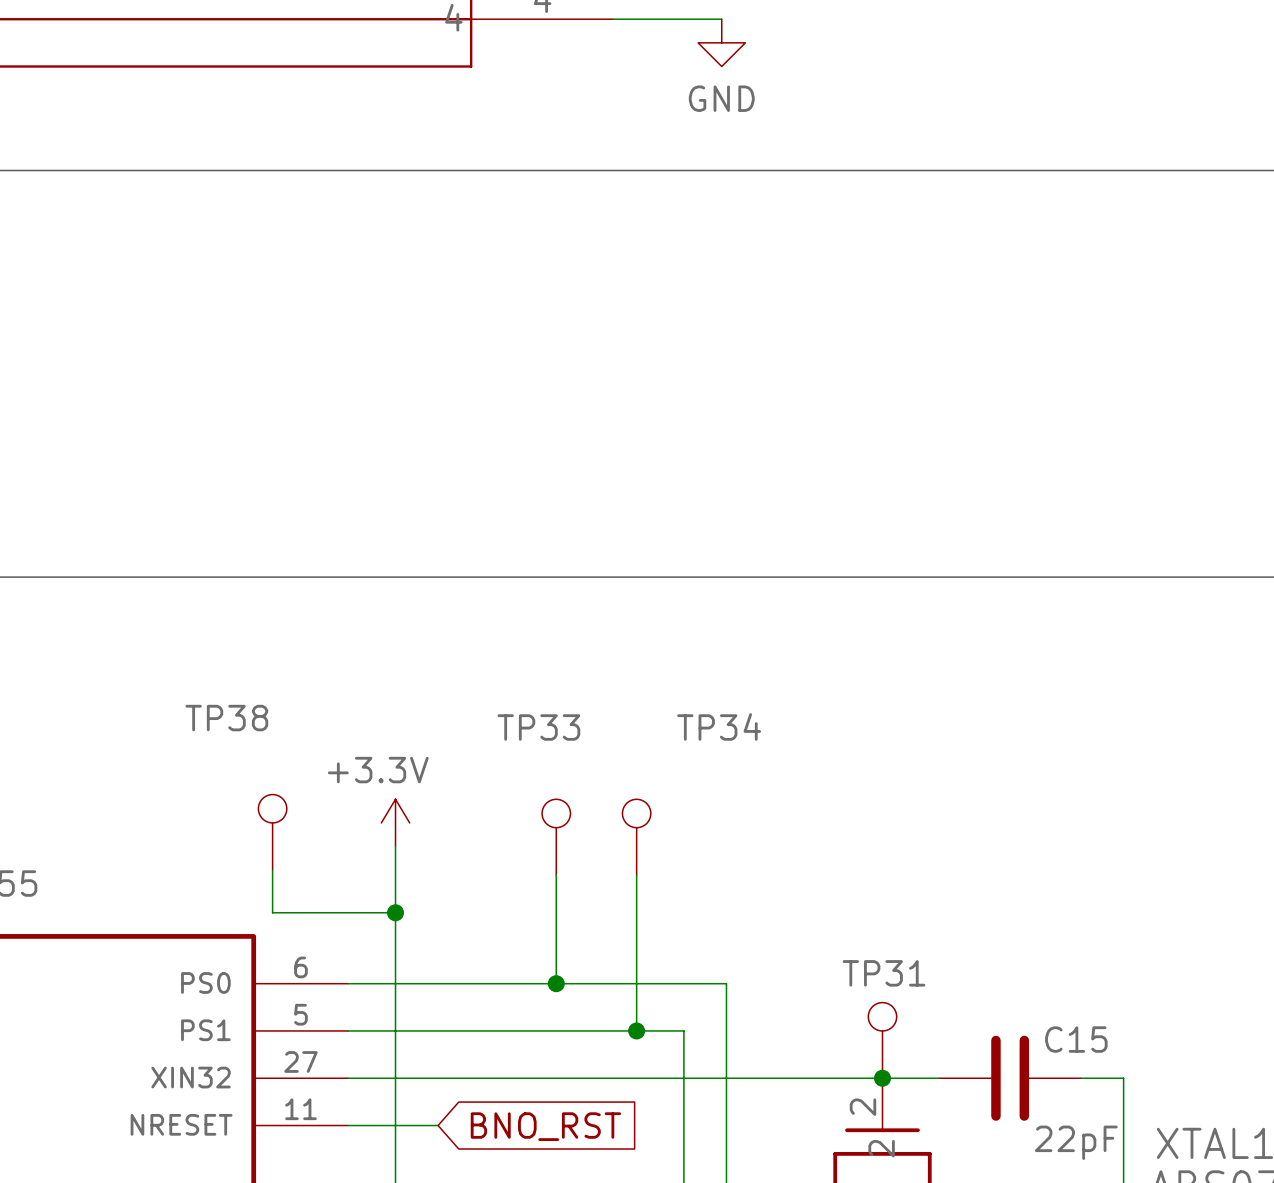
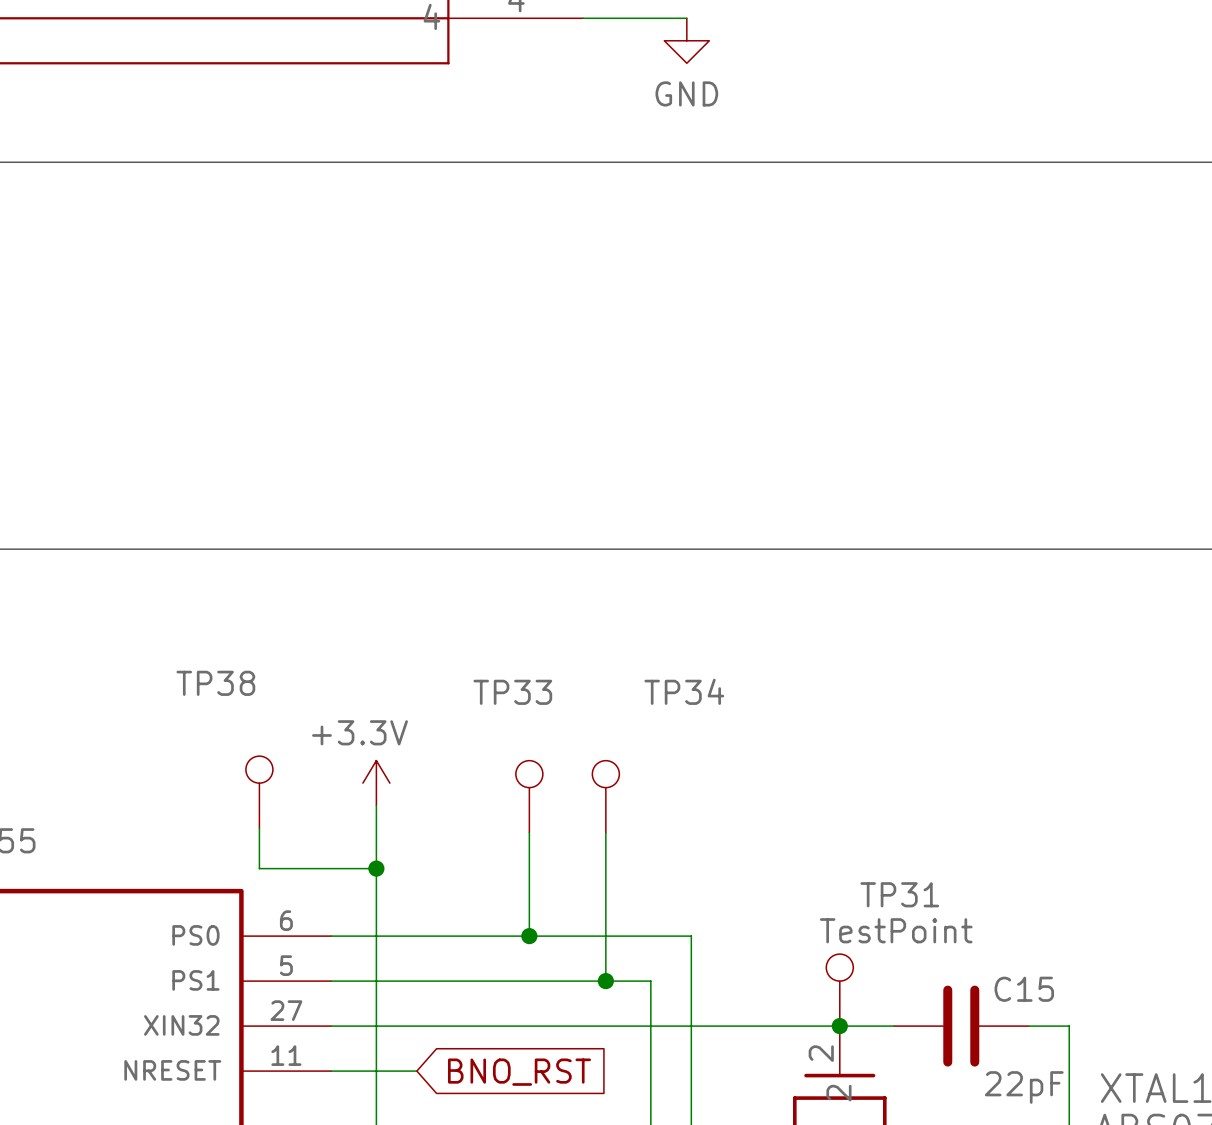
TP31 name position: TP31 (884, 973) -> TP31 (899, 894)
TP31 value: none -> TestPoint (896, 930)

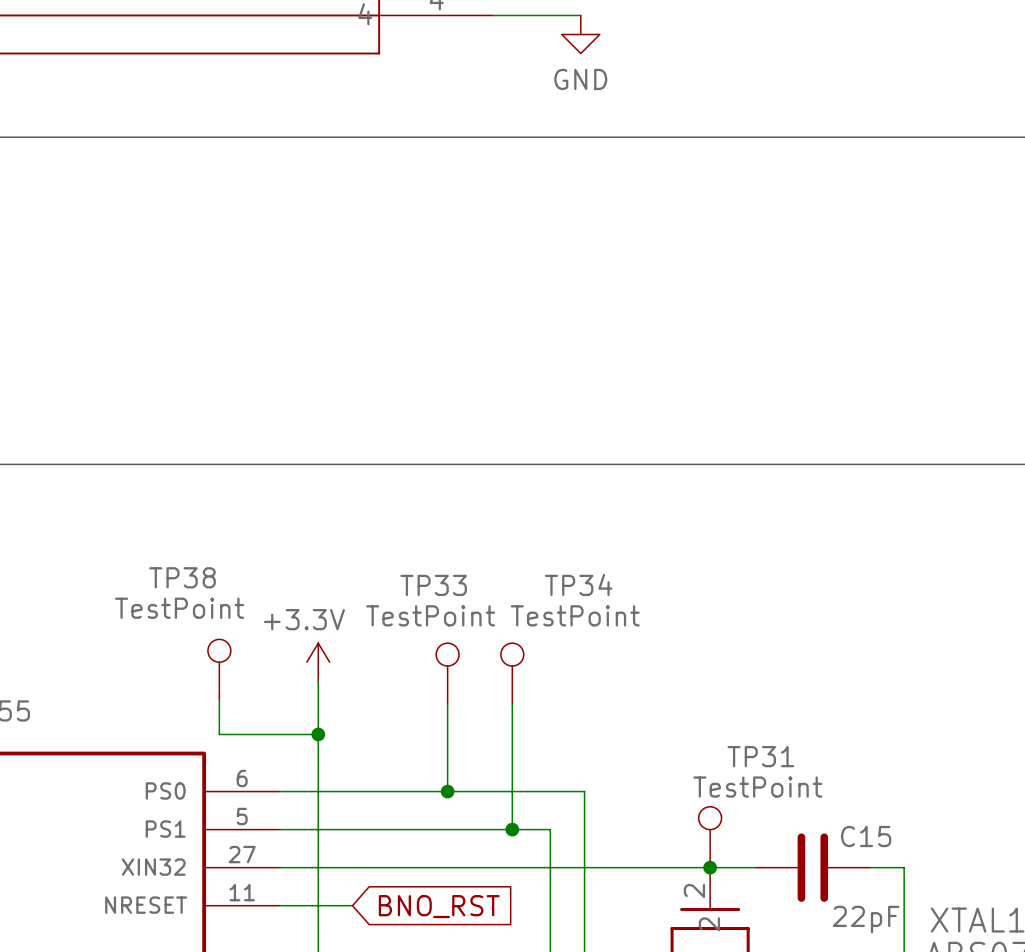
TP38 value: none -> TestPoint (179, 608)
TP33 value: none -> TestPoint (430, 615)
TP34 value: none -> TestPoint (575, 615)

